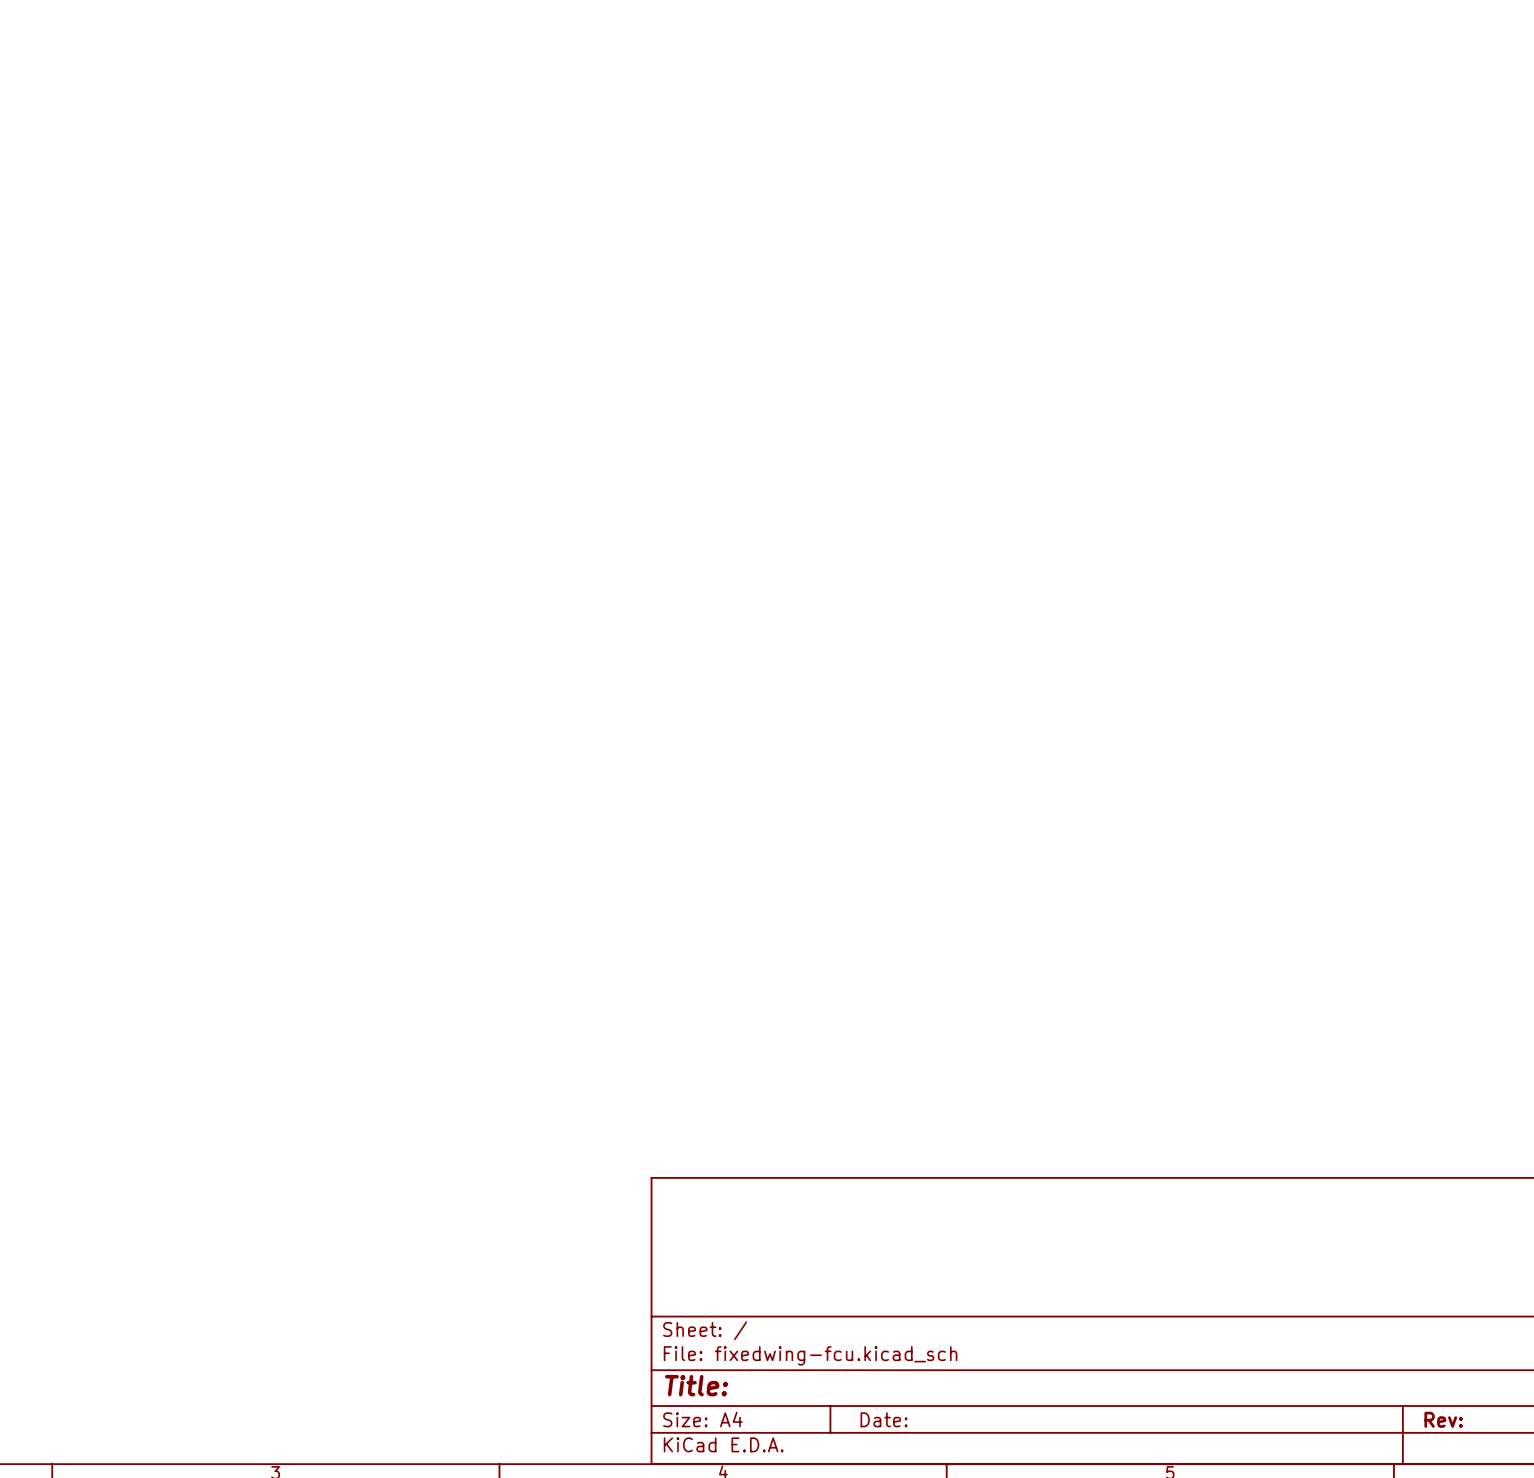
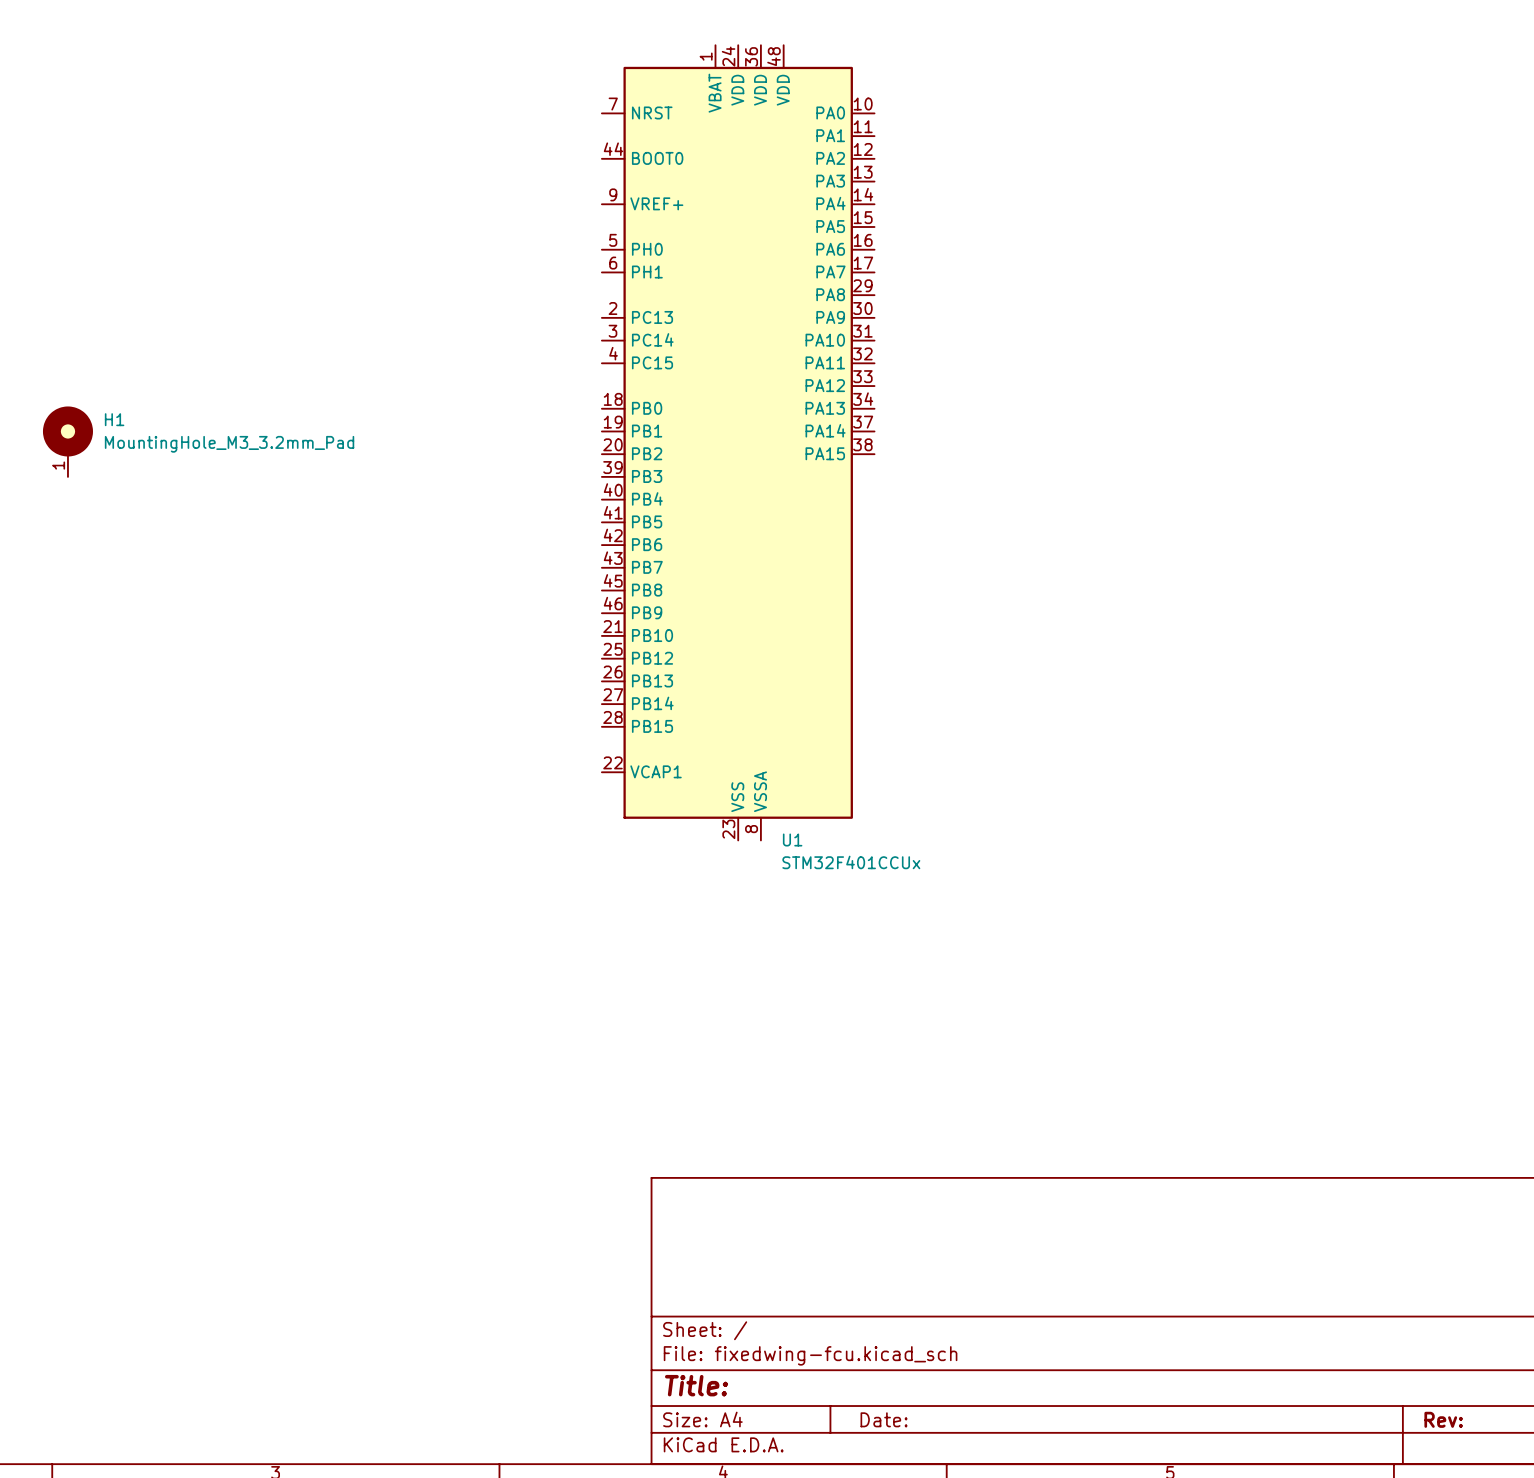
H1: none -> MountingHole_M3_3.2mm_Pad (67, 441)
U1: none -> STM32F401CCUx (738, 442)

